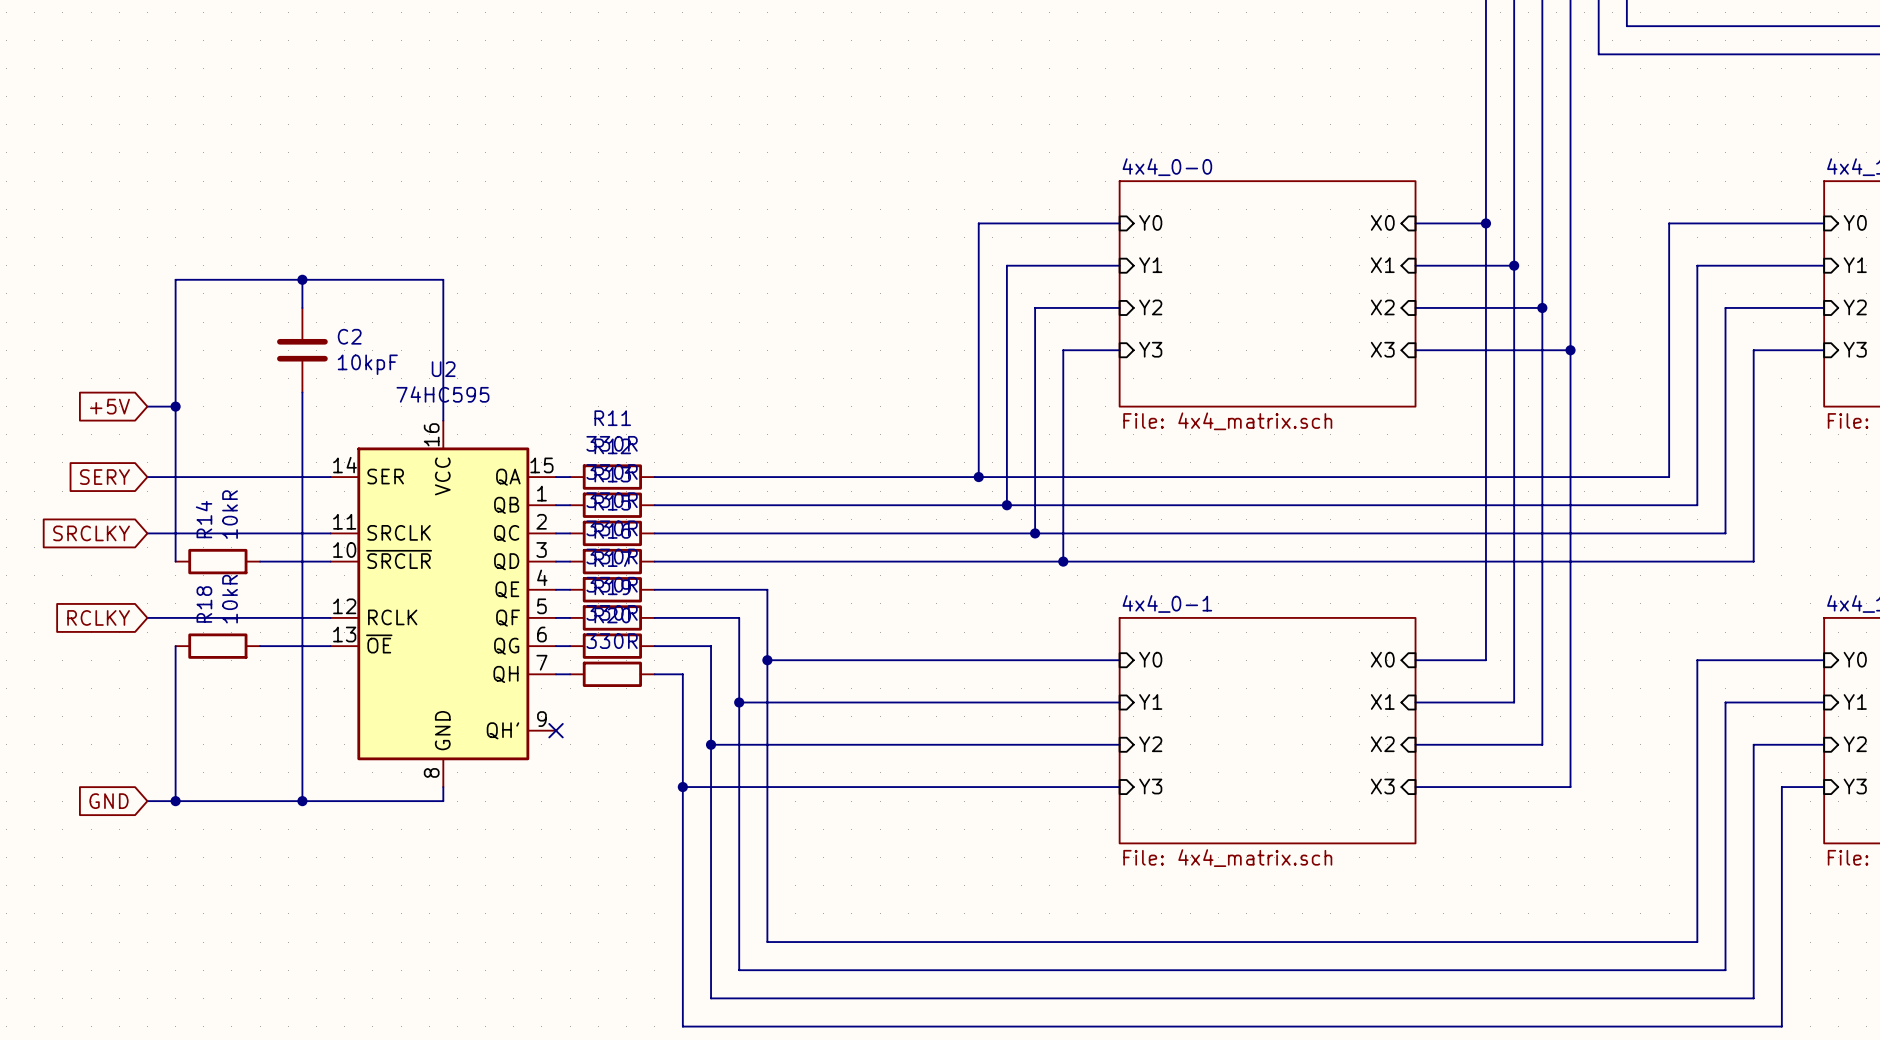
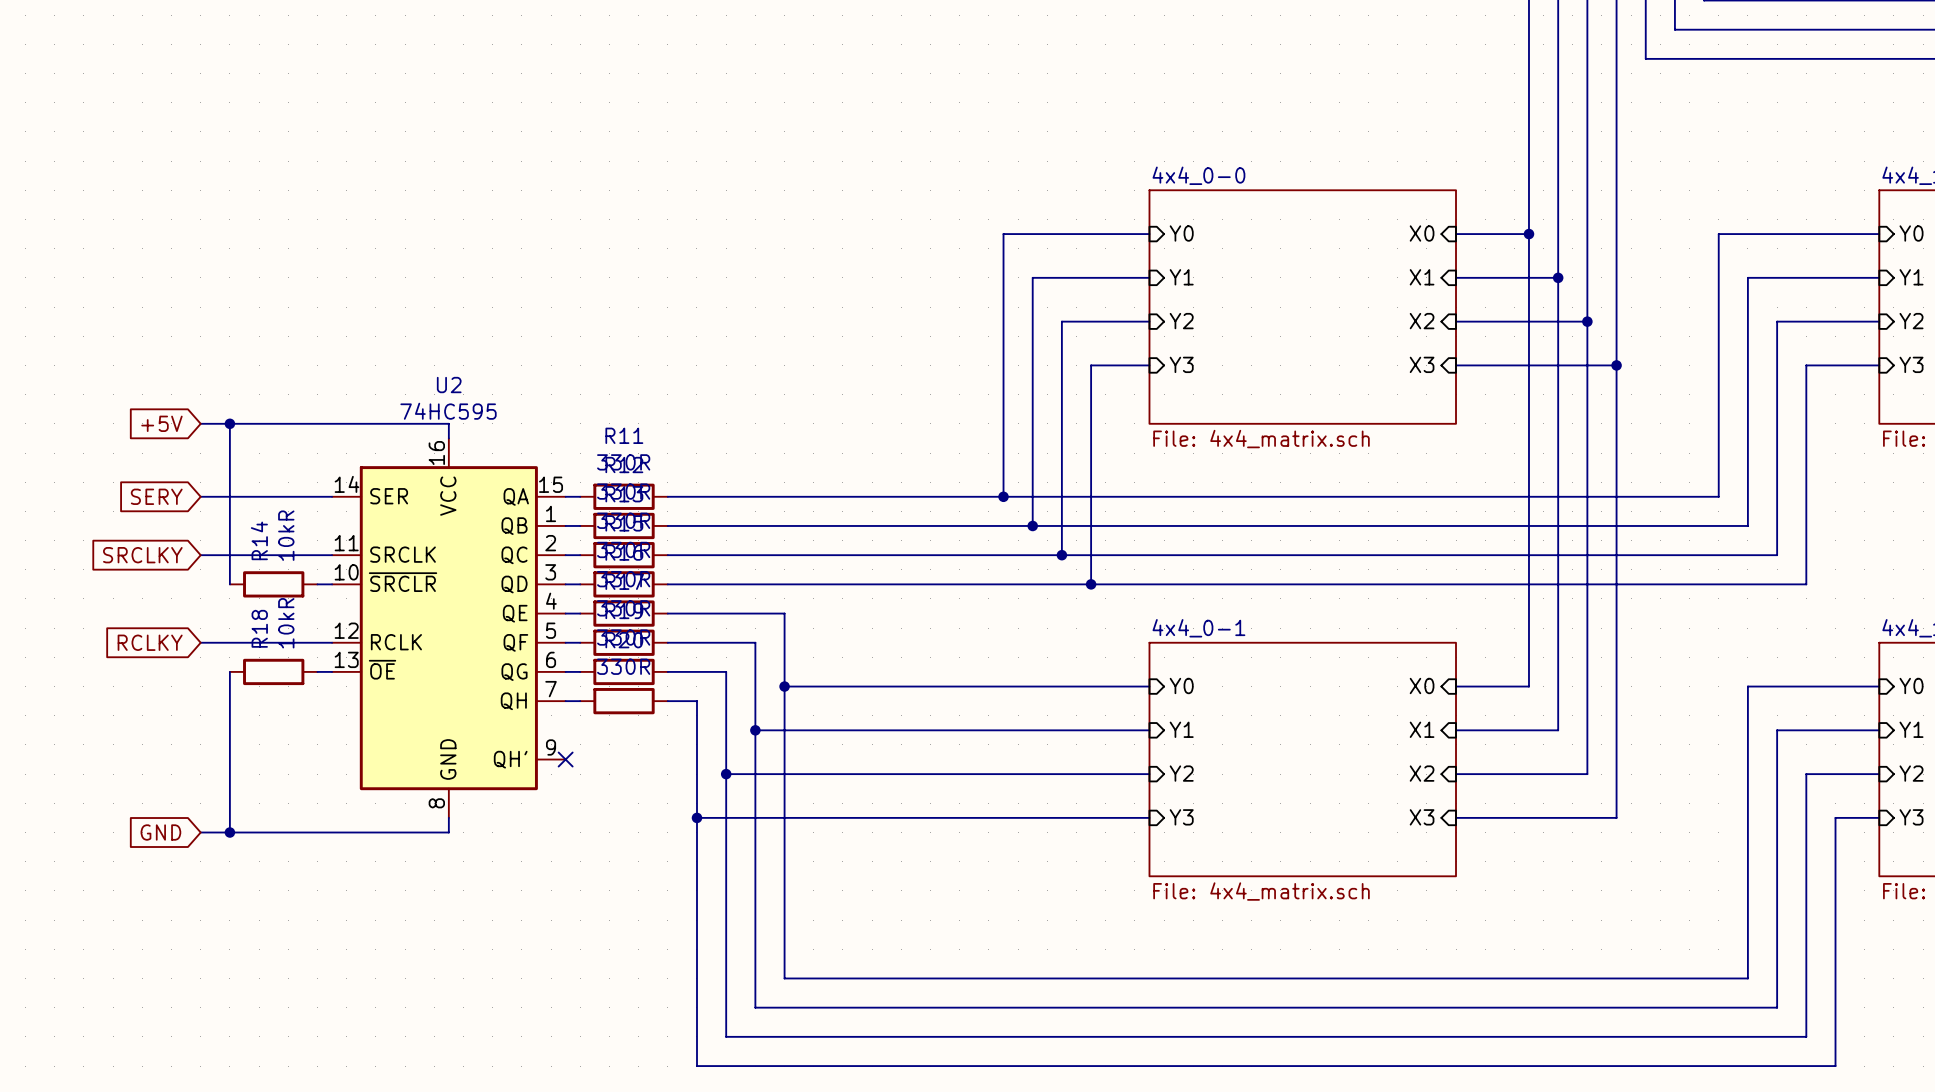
wire: (302, 279) (302, 307) -> none
junction: (302, 279) -> none
C2: 10kpF (302, 350) -> none
wire: (302, 392) (302, 801) -> none
global label position: +5V (110, 406) -> +5V (161, 423)
wire: (147, 406) (175, 406) -> none
junction position: (175, 406) -> (229, 423)
wire: none -> (229, 423) (229, 584)
wire: (443, 406) (443, 279) (175, 279) (175, 561) -> (448, 423) (200, 423)
global label position: SERY (104, 477) -> SERY (156, 496)
wire: (147, 477) (203, 477) -> none
global label position: SRCLKY (91, 533) -> SRCLKY (142, 555)
wire: (147, 533) (203, 533) -> none
R14 position: (217, 561) -> (273, 584)
wire: (260, 561) (316, 561) -> none
global label position: RCLKY (98, 617) -> RCLKY (150, 642)
wire: (147, 617) (203, 617) -> none
wire: (175, 646) (175, 801) -> (229, 671) (229, 832)
R18 position: (217, 646) -> (273, 671)
wire: (260, 646) (316, 646) -> none
global label position: GND (108, 801) -> GND (160, 832)
wire: (147, 801) (203, 801) -> none
junction: (175, 801) -> none
junction: none -> (229, 832)
junction: (302, 801) -> none

